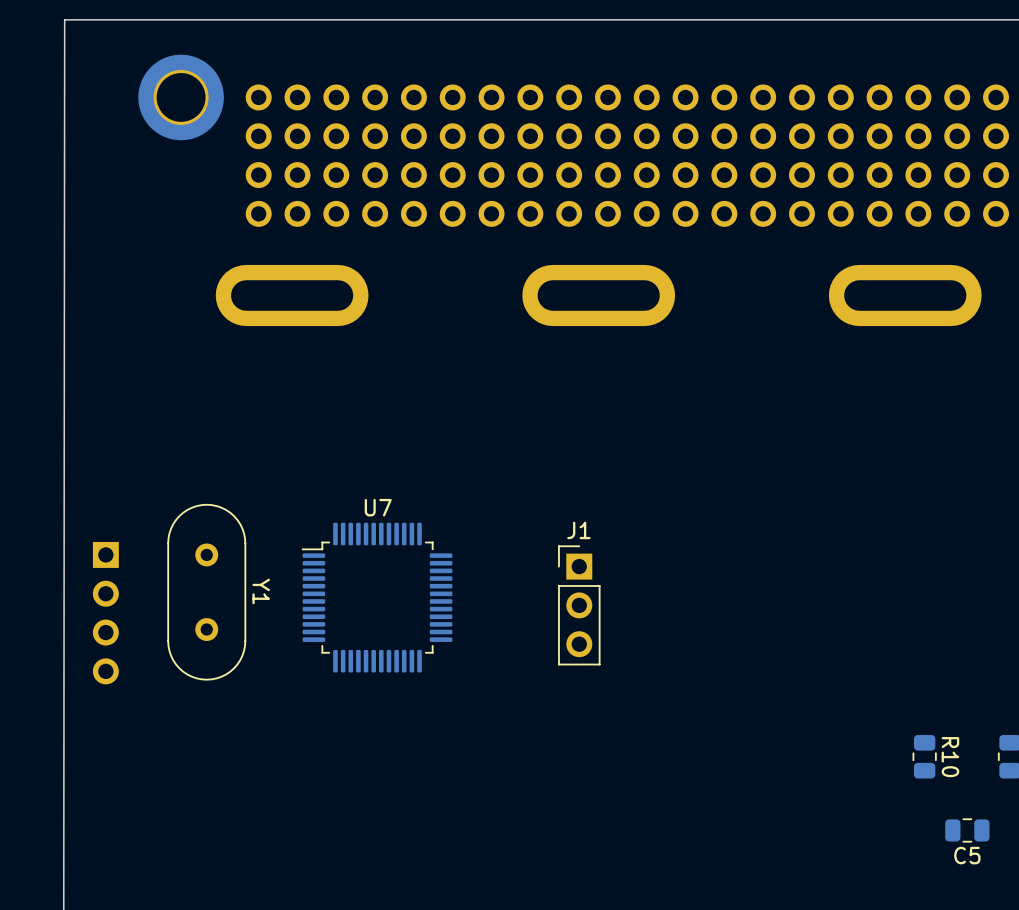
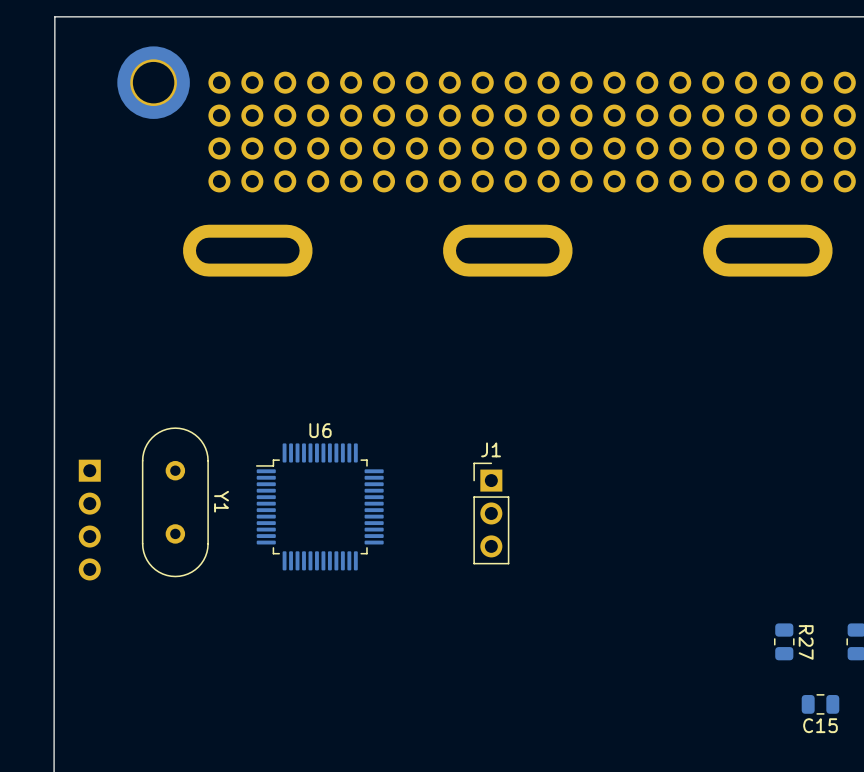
U7 name: U7 (378, 507) -> U6 (320, 430)
R10 name: R10 (950, 757) -> R27 (806, 642)
C5 name: C5 (967, 855) -> C15 (820, 725)

